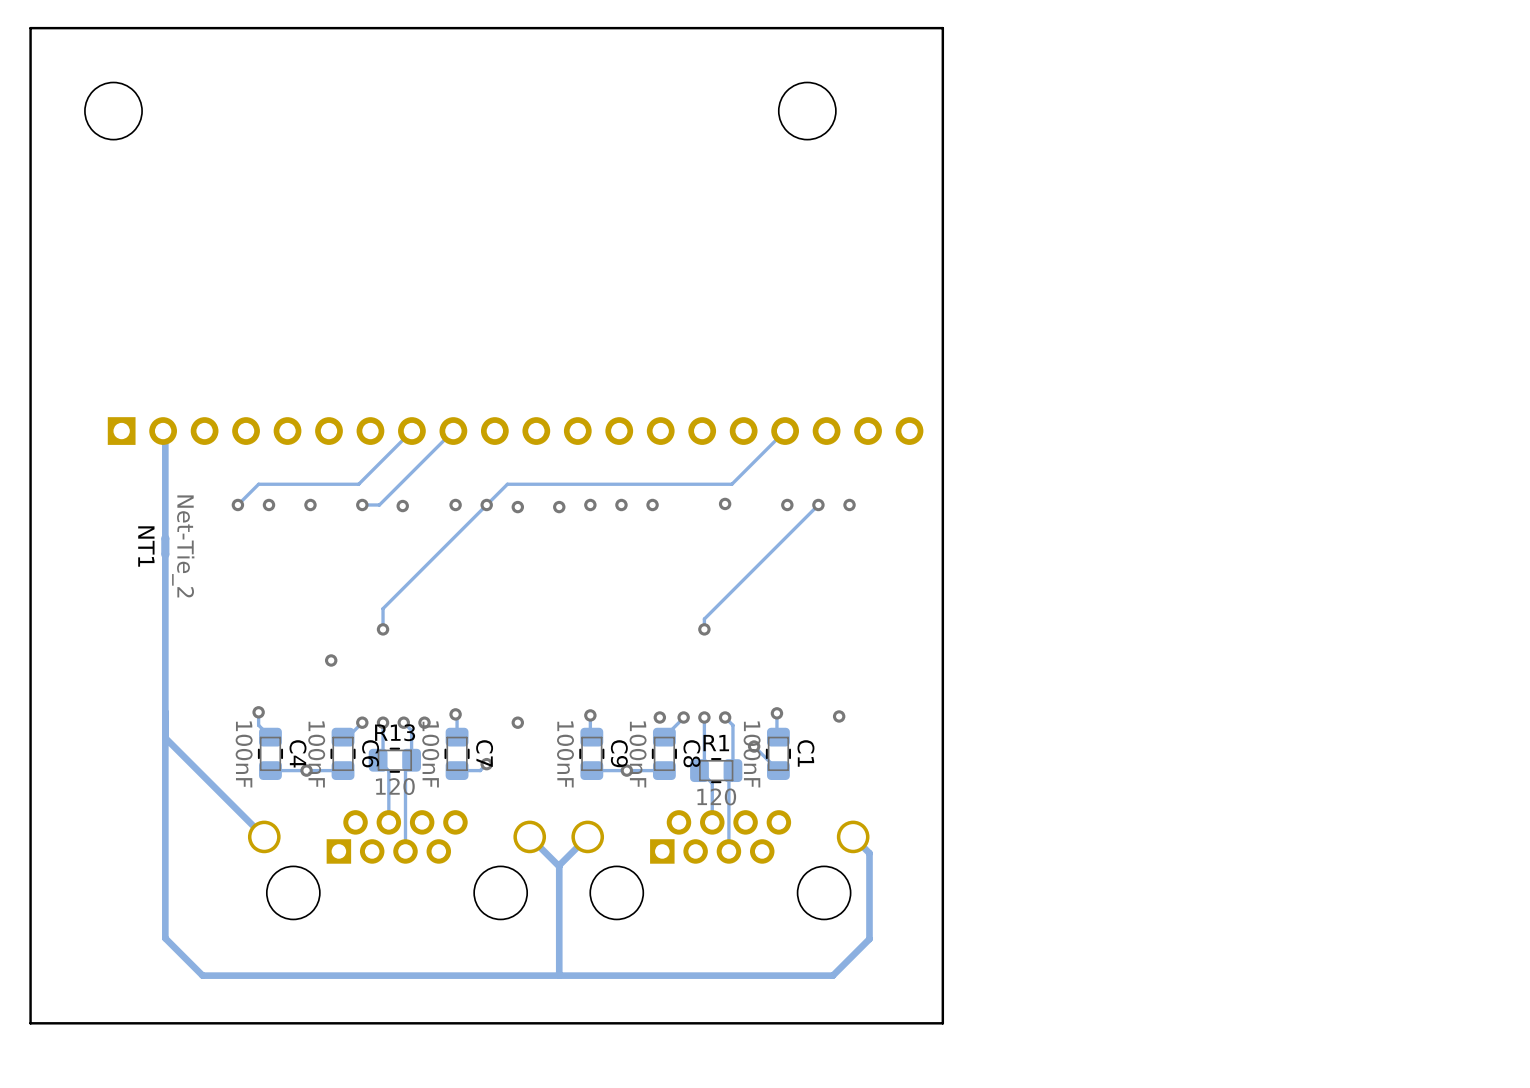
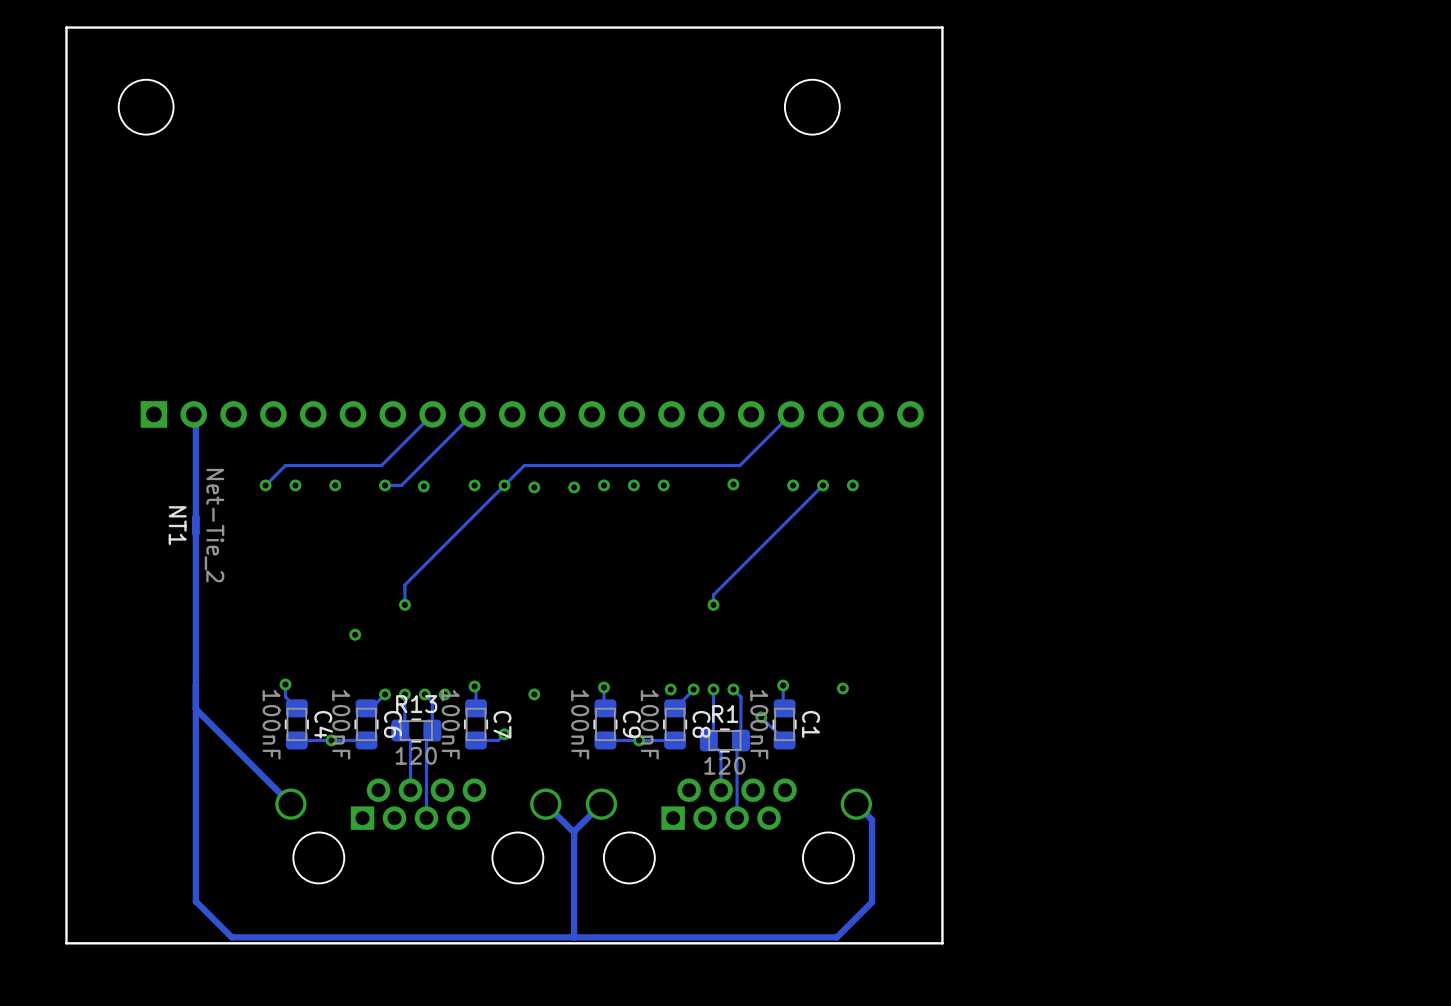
board edge: (942, 981) (942, 1023) (30, 1023) (30, 981) -> (942, 943) (66, 943)

